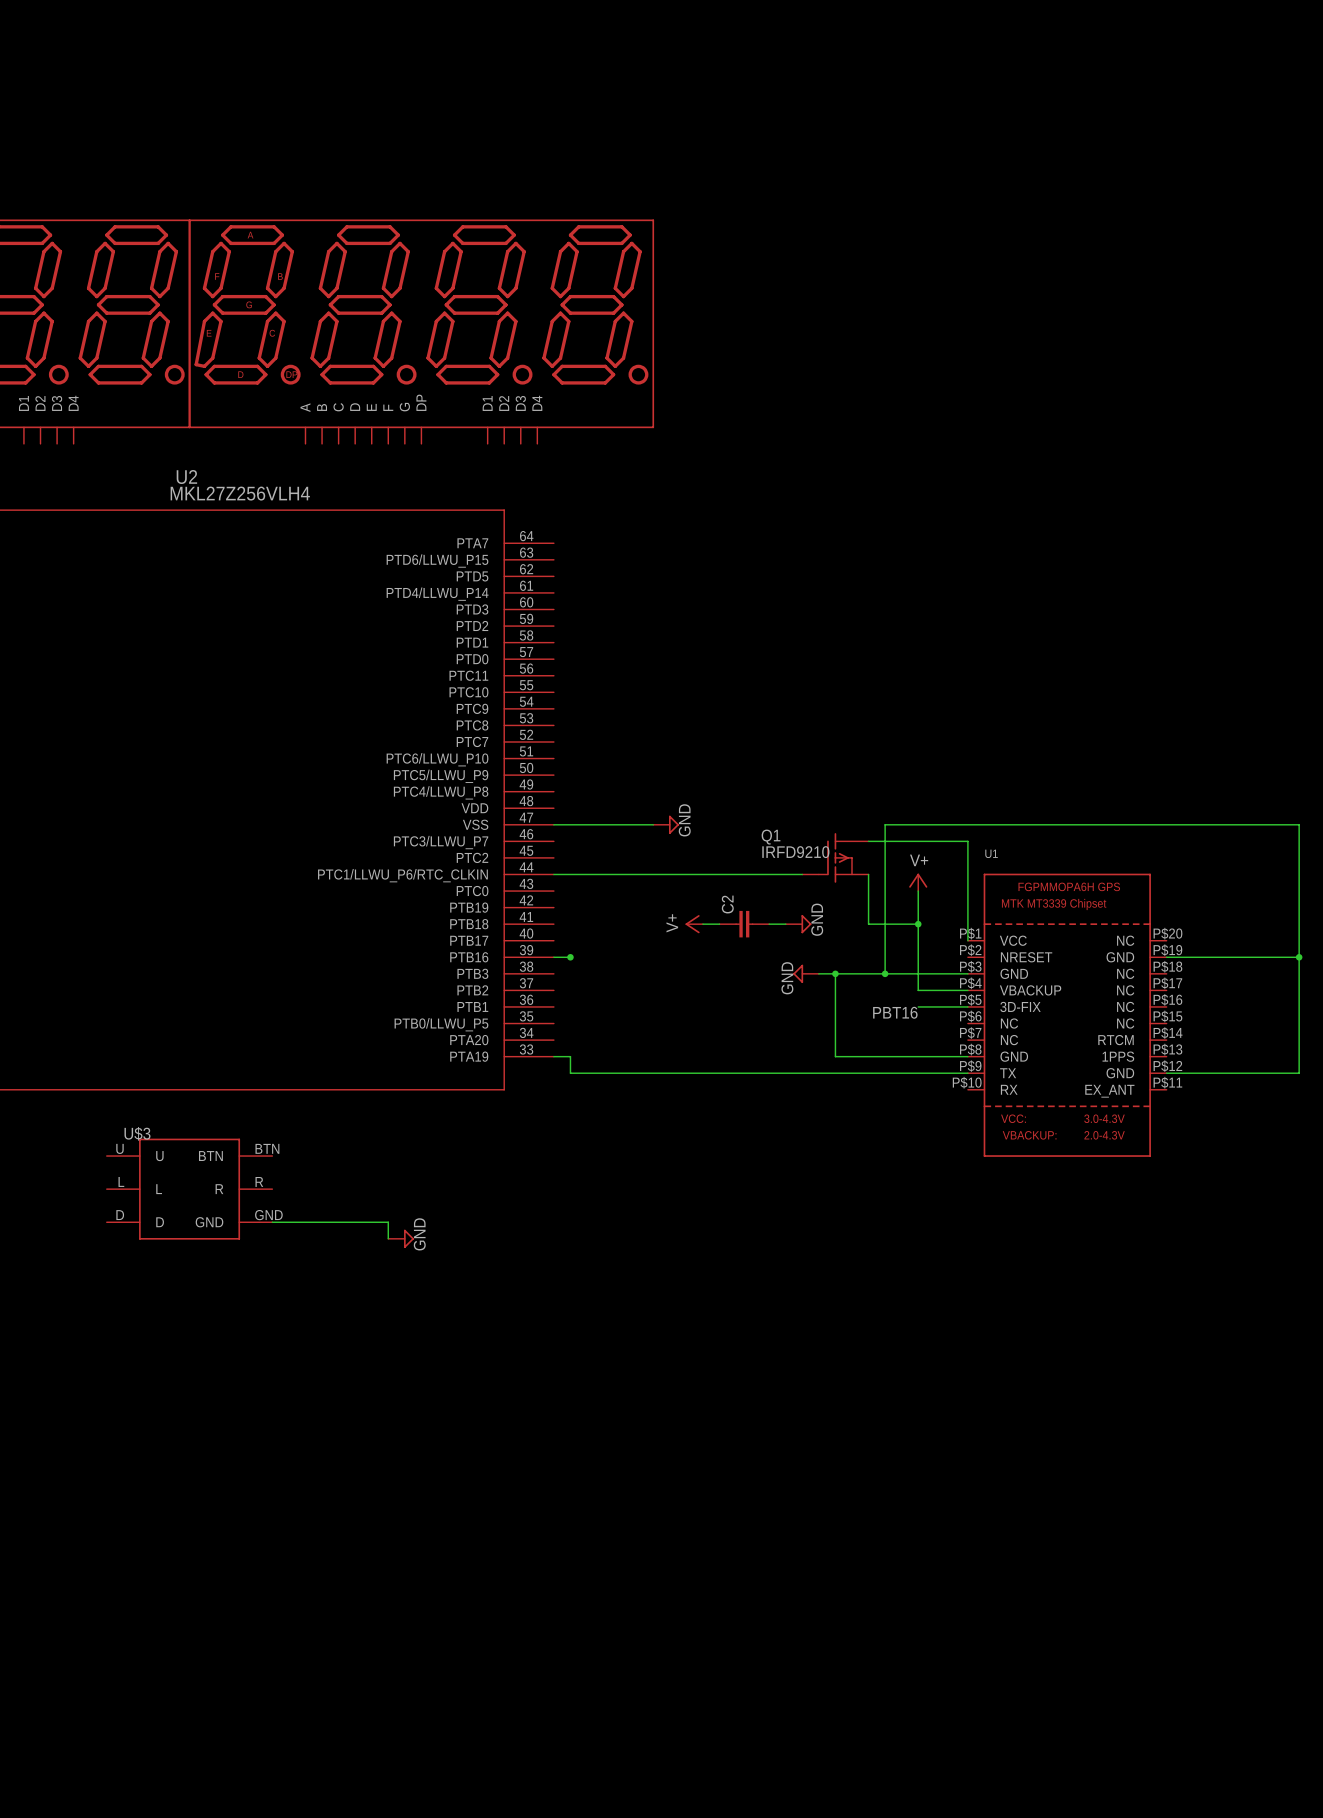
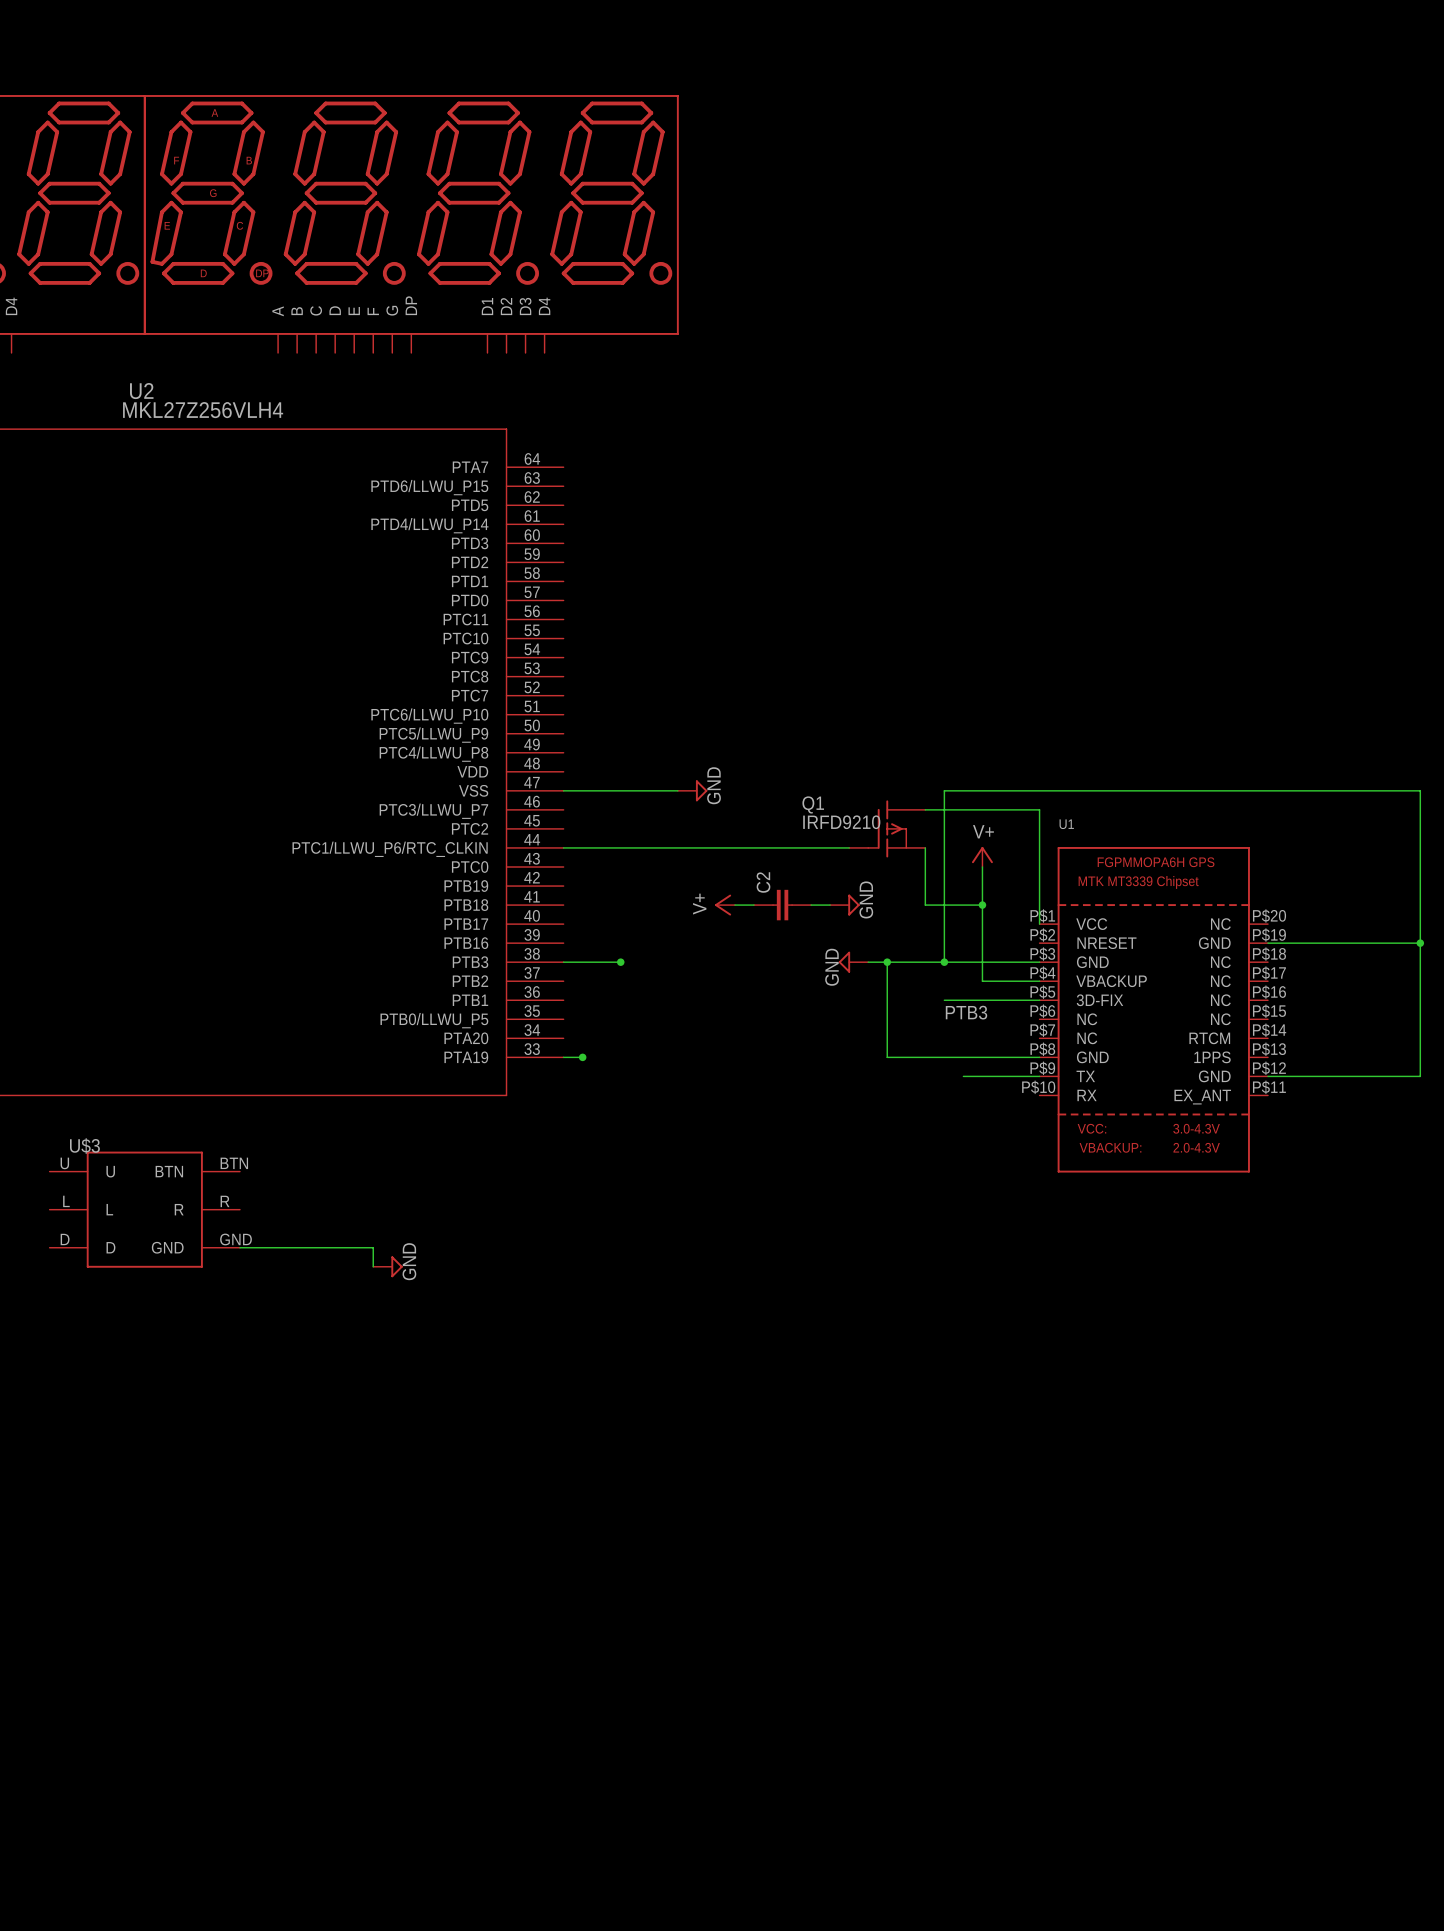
wire: (553, 957) (570, 957) -> none
junction position: (570, 957) -> (620, 962)
wire: none -> (563, 962) (620, 962)
wire: none -> (944, 1000) (982, 1000)
label: PBT16 (895, 1012) -> none
label: none -> PTB3 (966, 1012)
wire: (570, 1056) (570, 1073) (901, 1073) -> none
junction: none -> (582, 1057)

